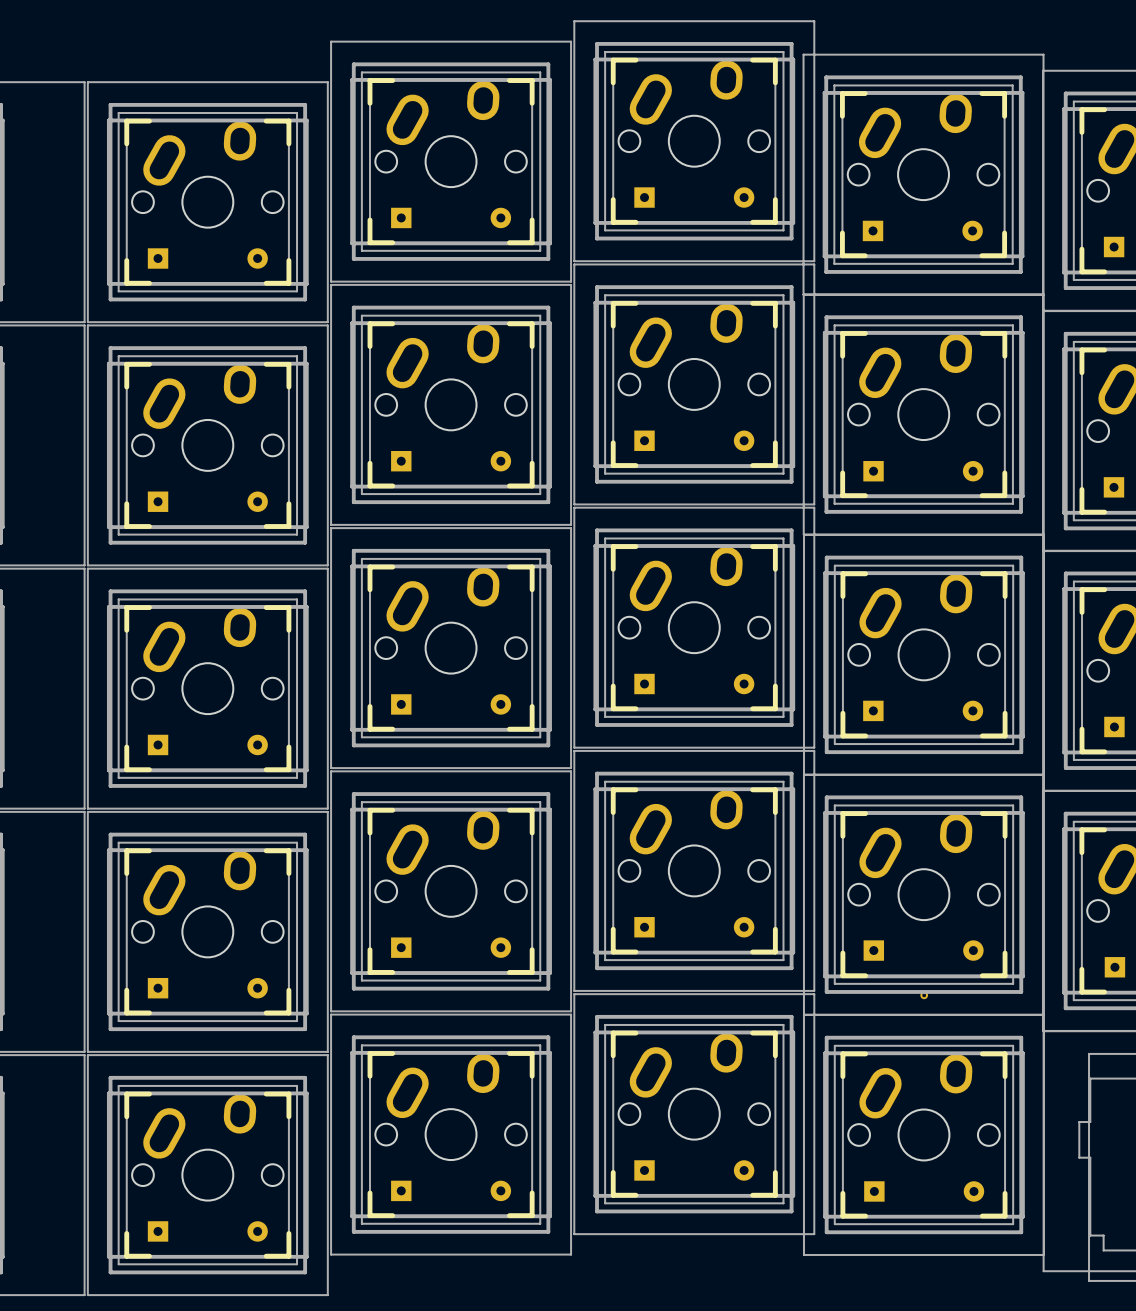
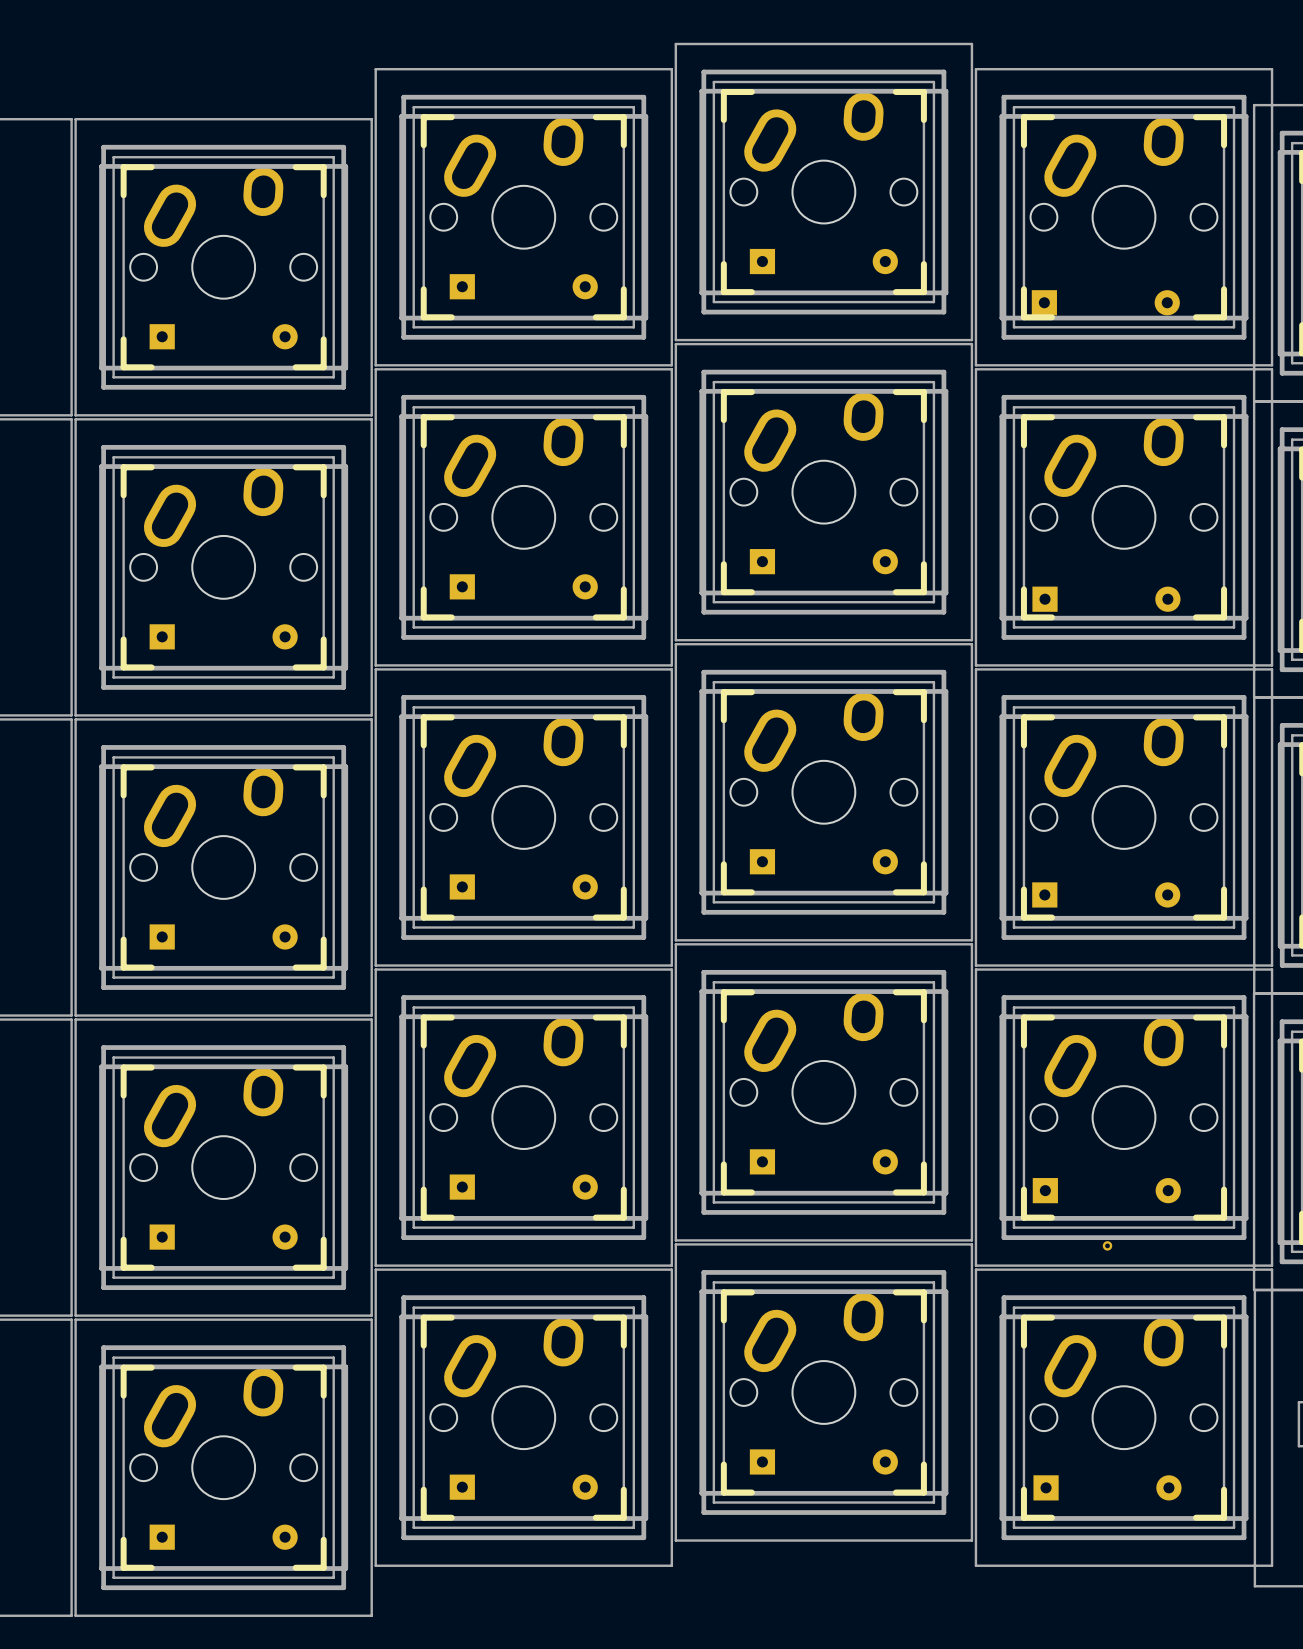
part position: (923, 174) -> (1123, 217)
part position: (923, 414) -> (1123, 517)
part position: (924, 654) -> (1123, 817)
part position: (923, 894) -> (1123, 1117)
part position: (923, 1134) -> (1123, 1417)

